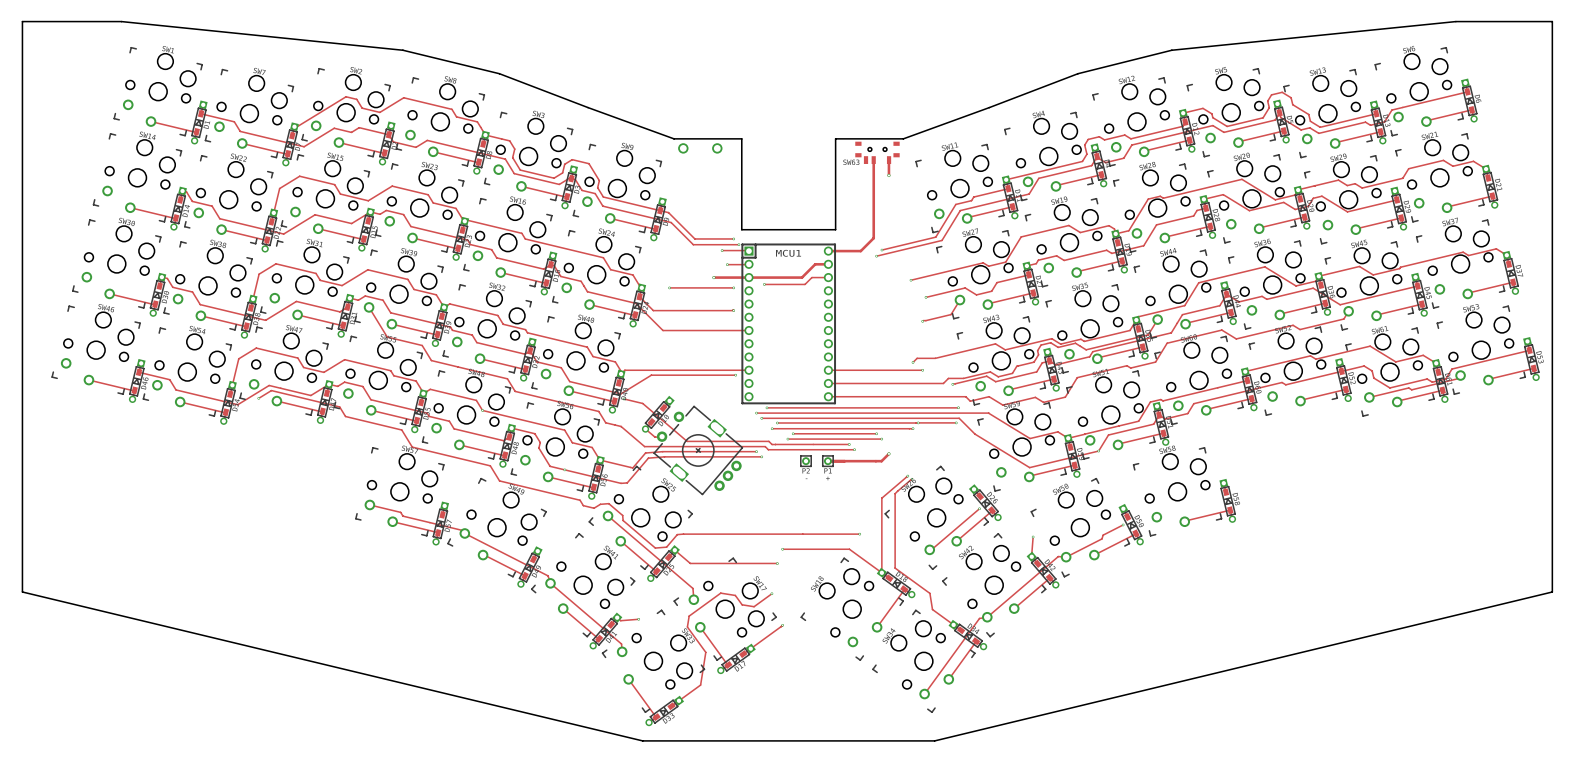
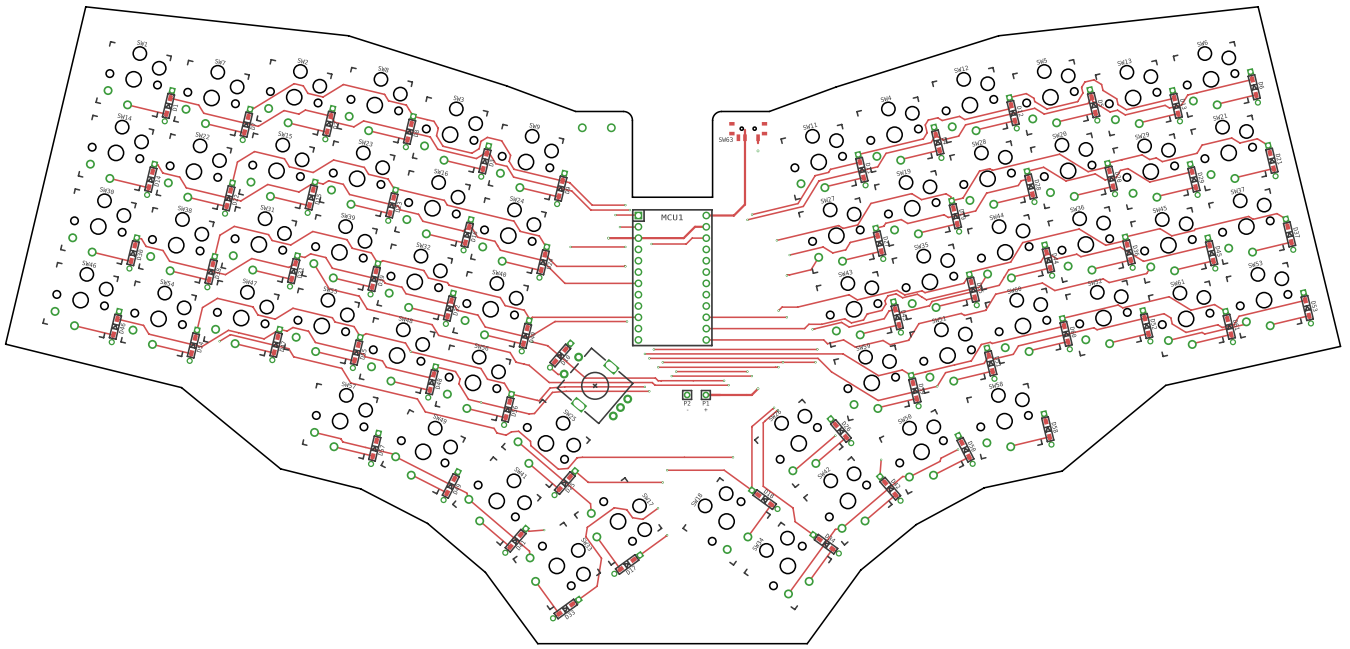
track: (888, 166) (888, 175) -> (744, 129) (744, 137)
board edge: (741, 229) (741, 138) (674, 138) (499, 73) (402, 50) (121, 21) (22, 21) (22, 591) (642, 740) (934, 740) (1552, 591) (1552, 21) (1455, 21) (1171, 50) (1078, 73) (903, 138) (835, 138) (835, 229) -> (632, 197) (632, 120) (626, 112) (575, 111) (506, 85) (348, 35) (85, 6) (5, 344) (181, 387) (280, 468) (360, 488) (427, 523) (485, 572) (537, 643) (807, 643) (860, 570) (916, 524) (984, 487) (1062, 471) (1165, 385) (1340, 346) (1258, 6) (998, 35) (836, 86) (769, 111) (718, 112) (712, 119) (712, 197)

